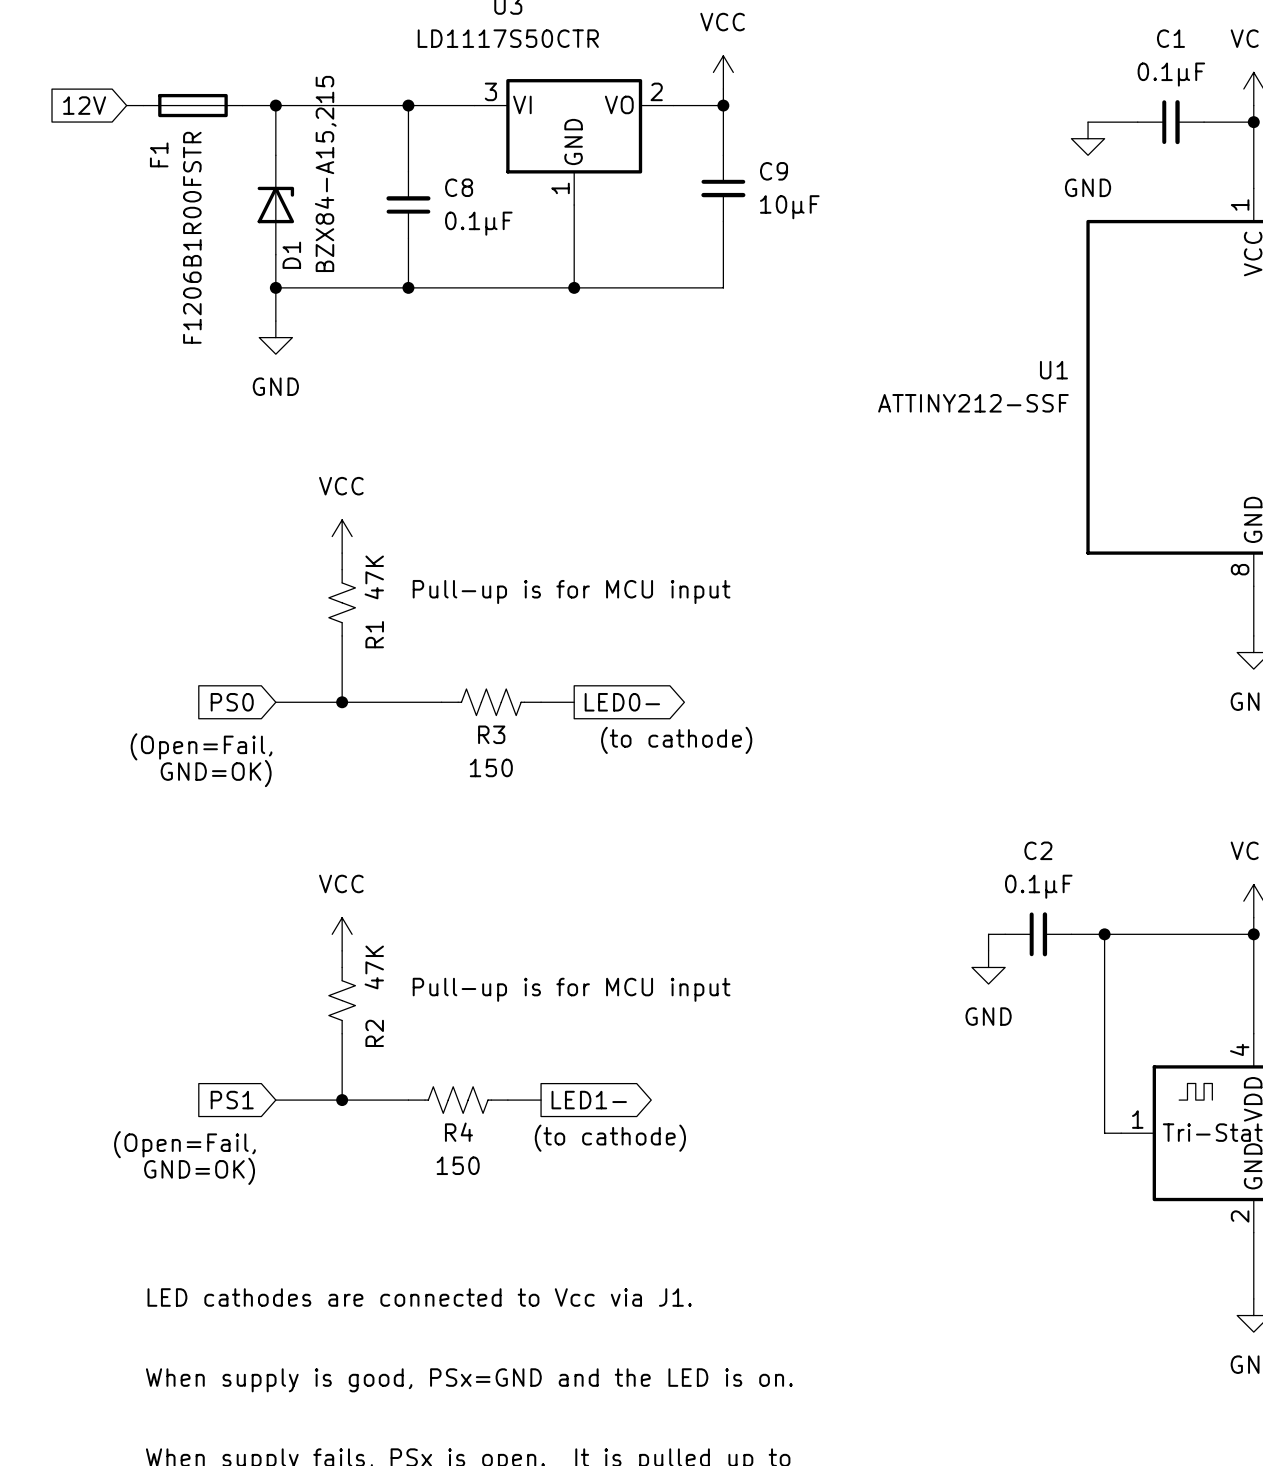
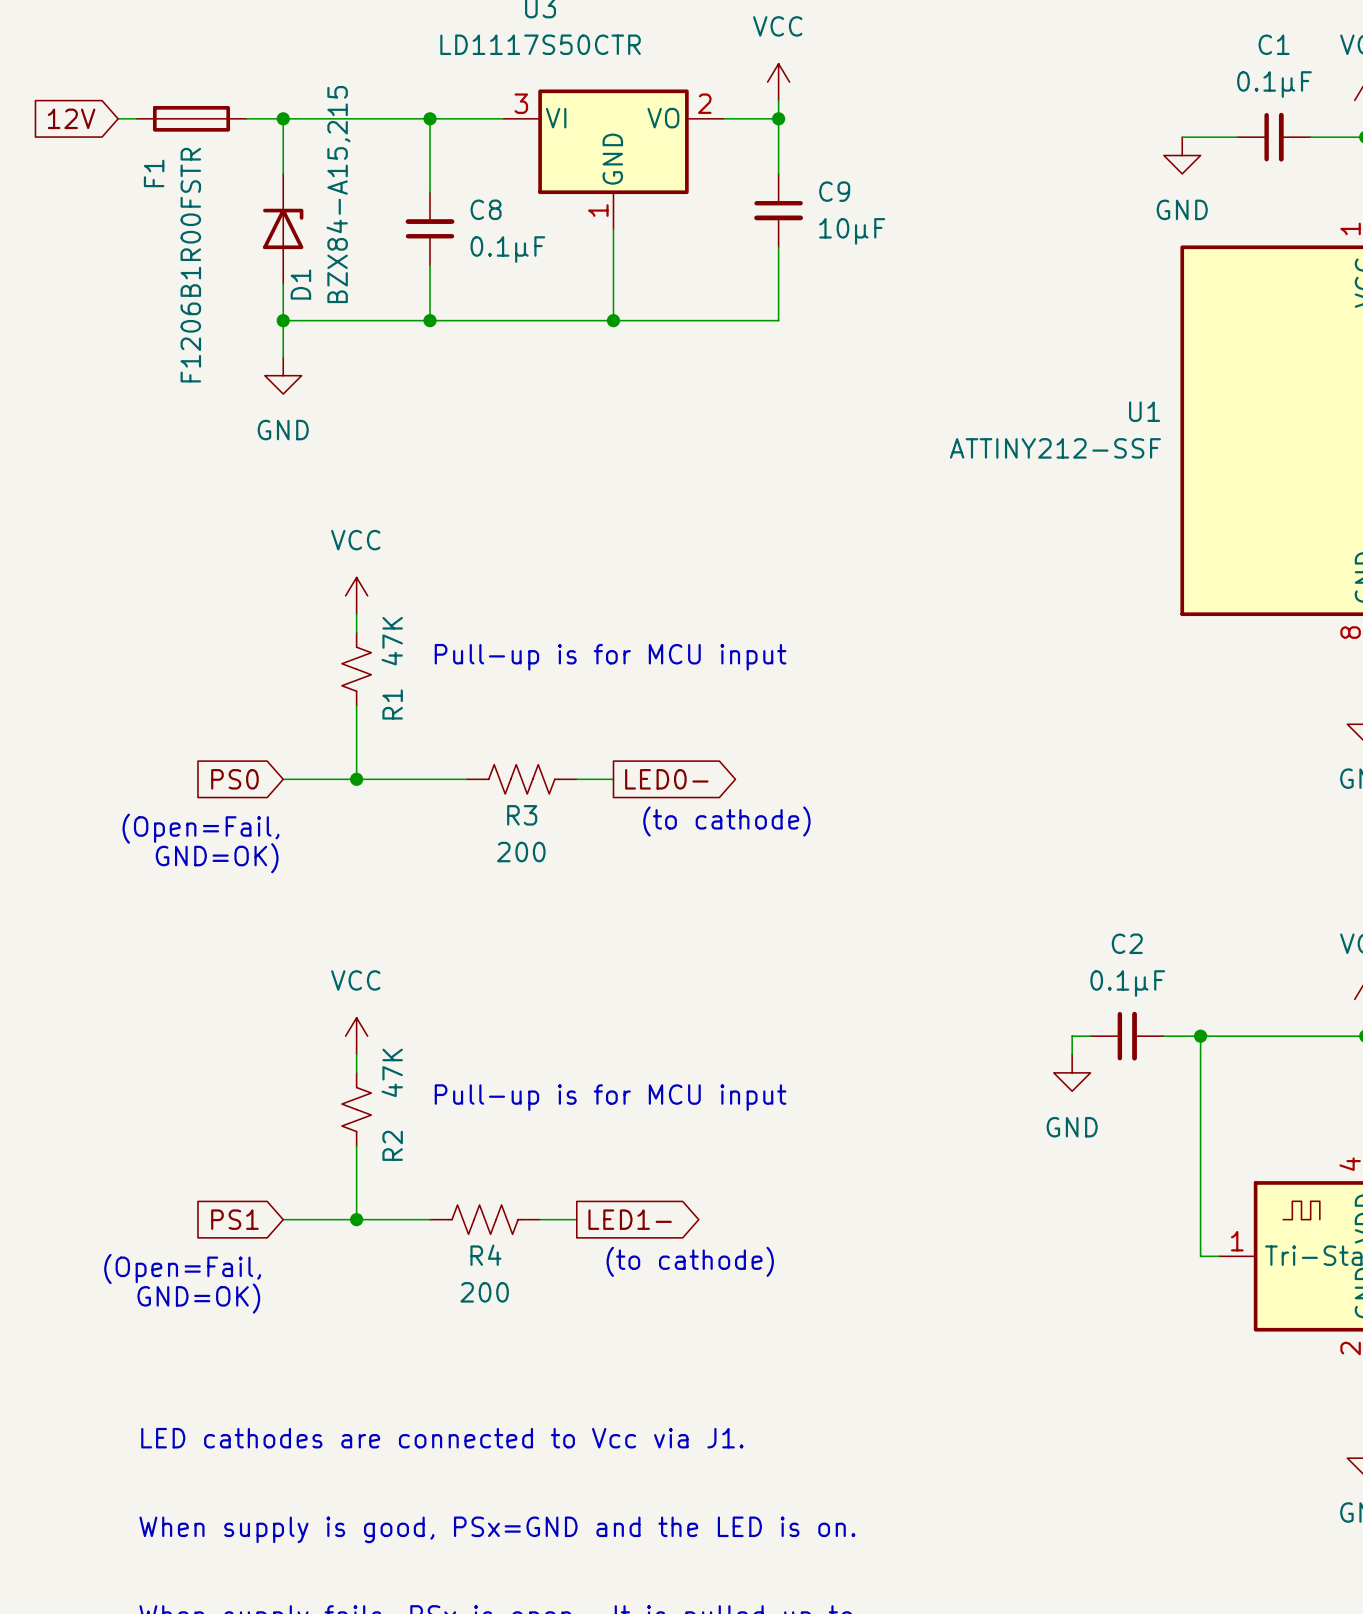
R3 value: 150 (491, 767) -> 200 (521, 852)
text position: (to cathode) (610, 1138) -> (to cathode) (690, 1261)
R4 value: 150 (458, 1165) -> 200 (484, 1292)

